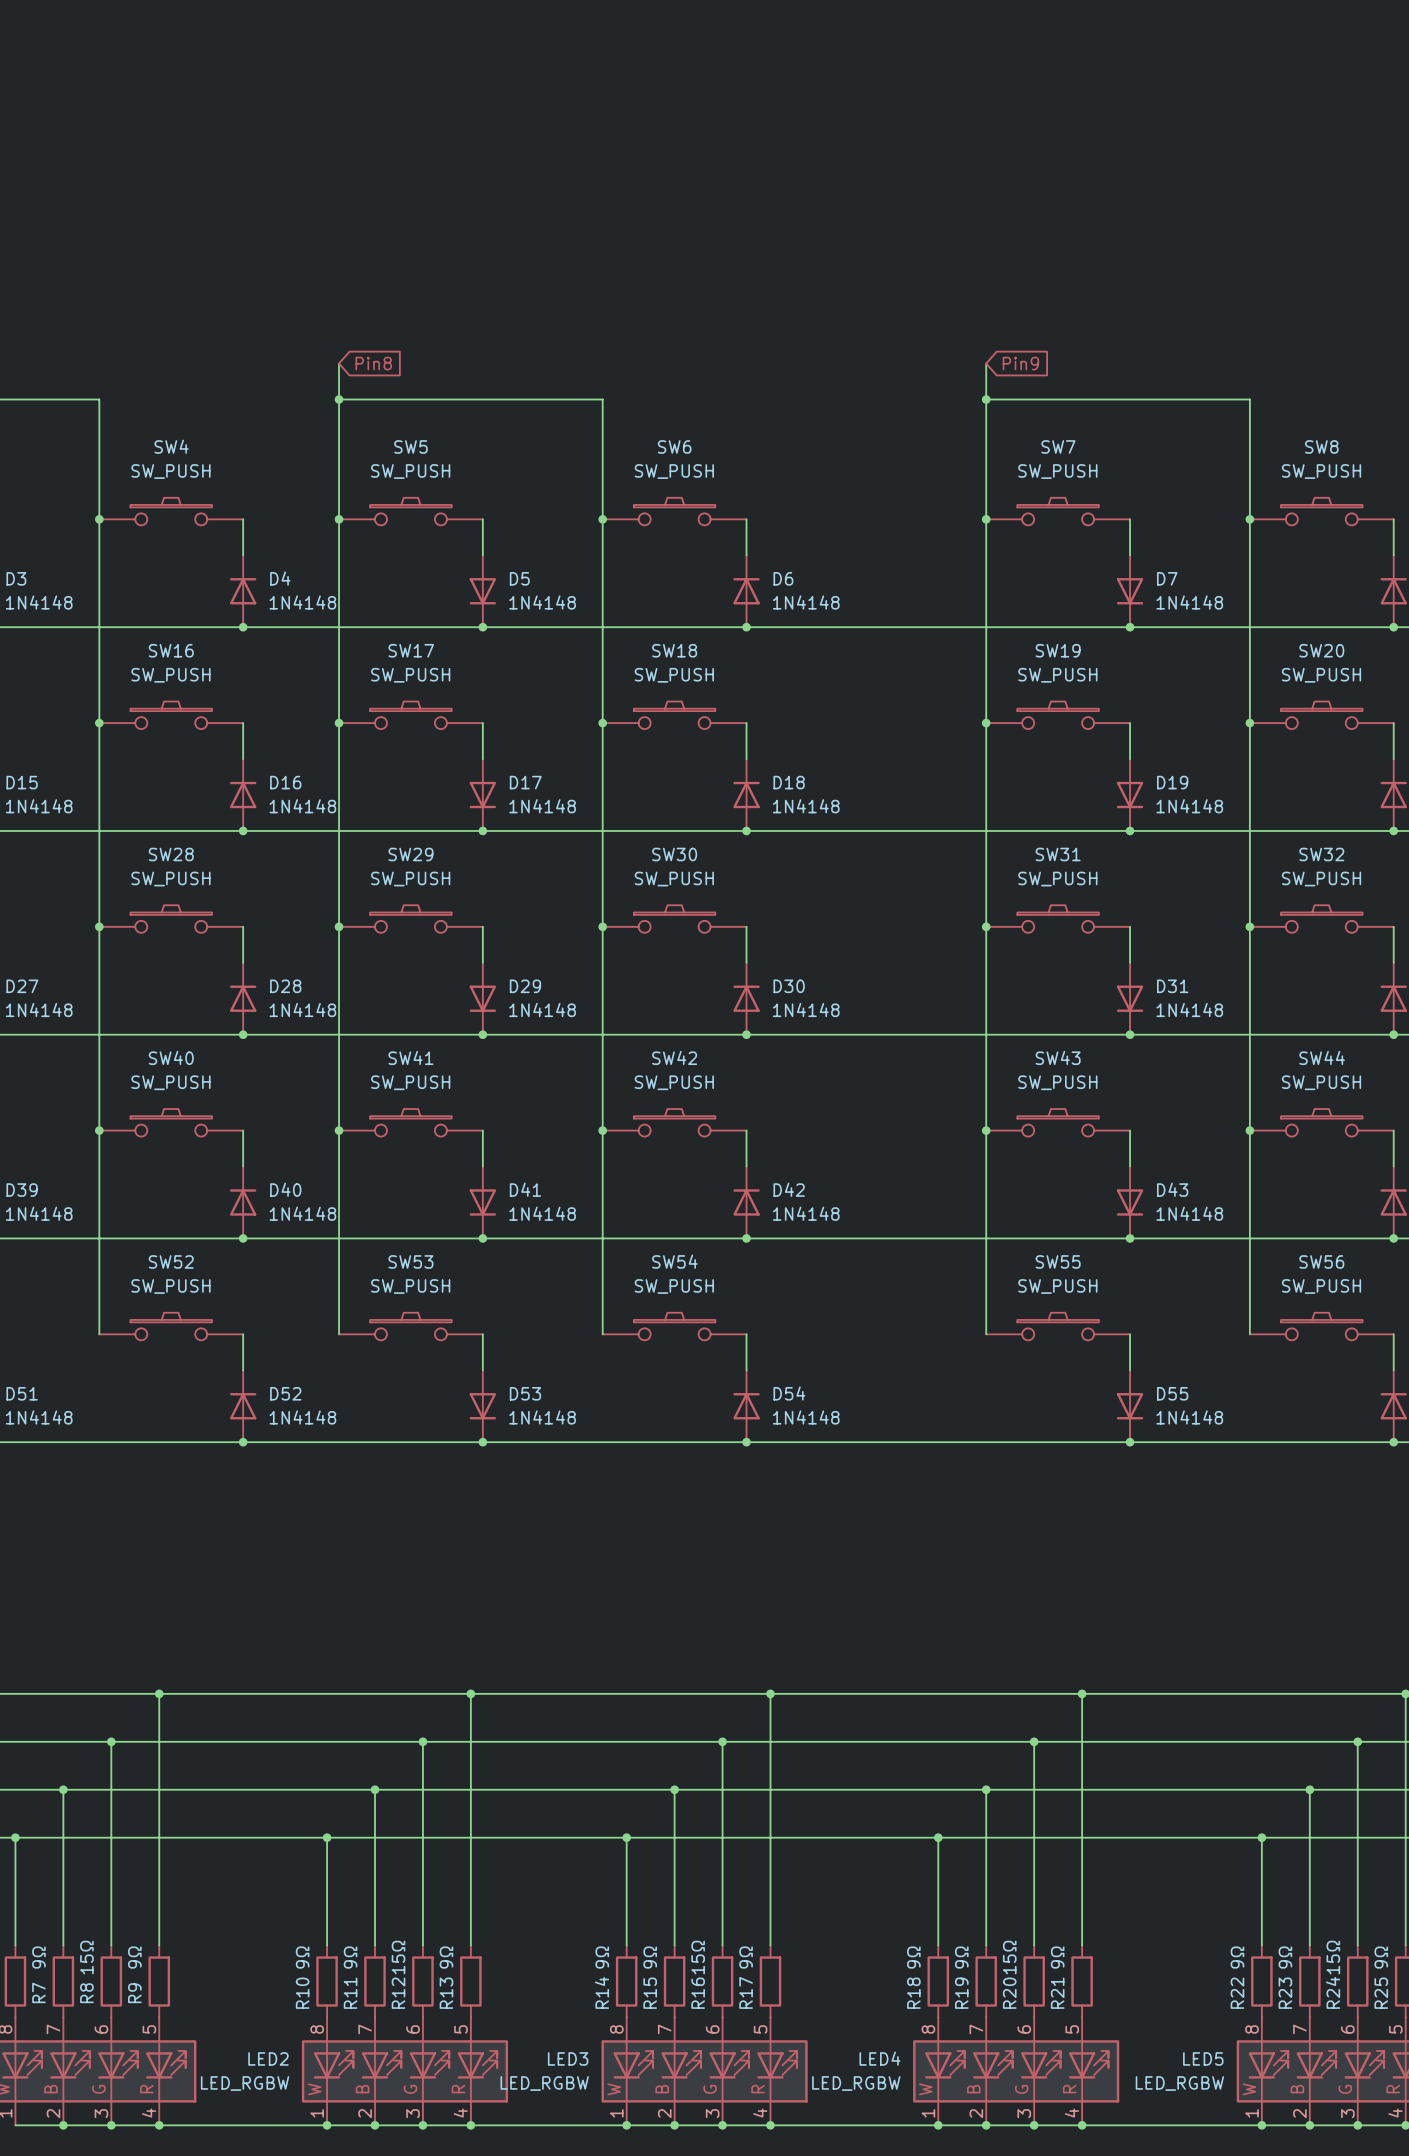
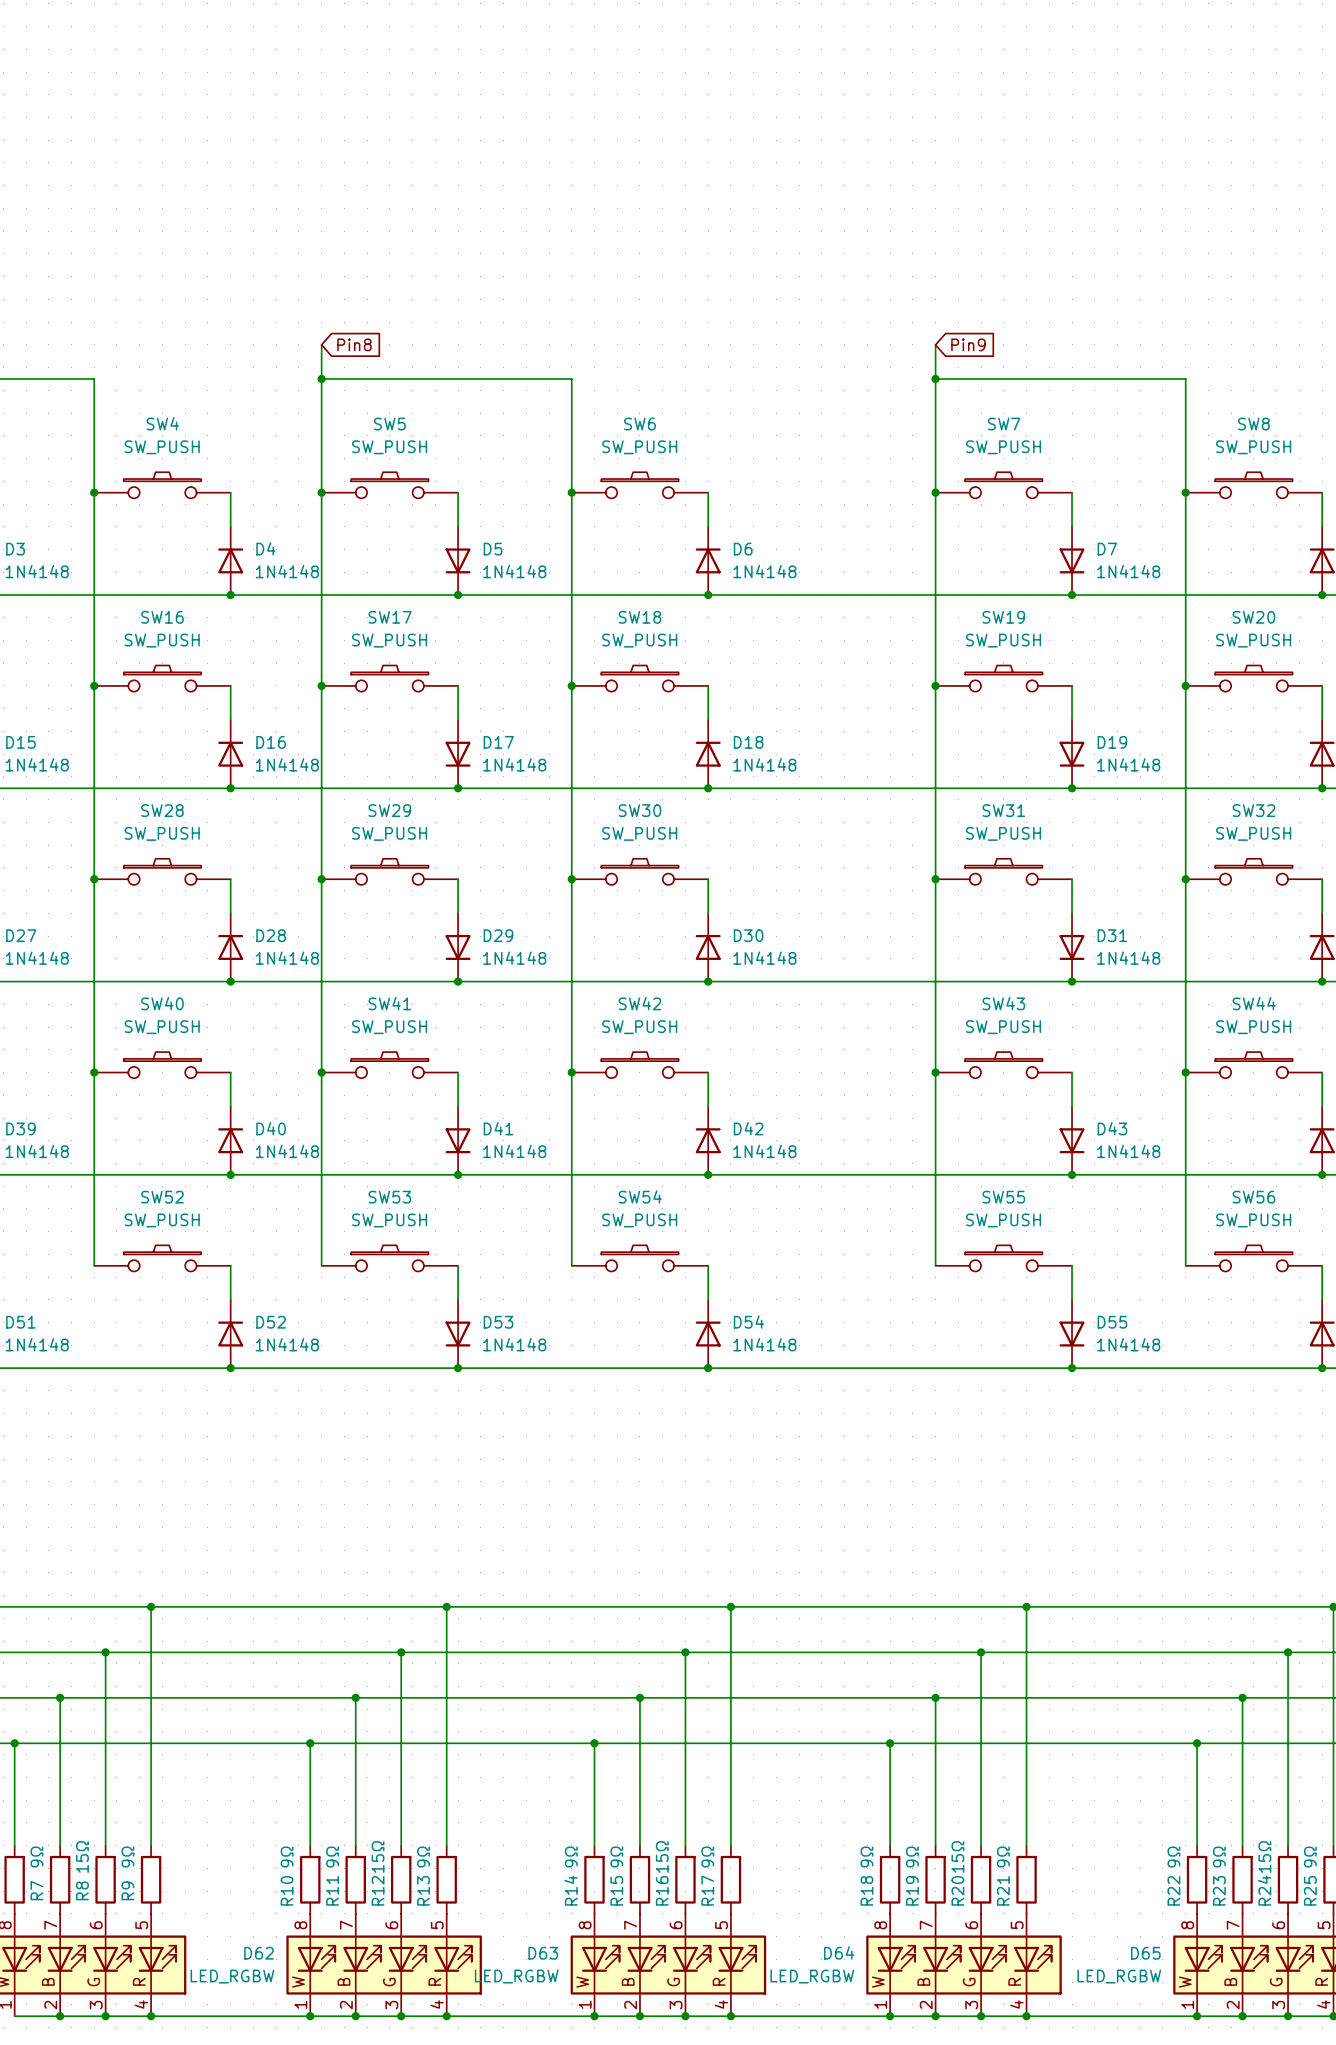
LED2 name: LED2 (268, 2058) -> D62 (259, 1953)
LED3 name: LED3 (568, 2058) -> D63 (543, 1953)
LED4 name: LED4 (879, 2058) -> D64 (839, 1952)
LED5 name: LED5 (1203, 2058) -> D65 (1145, 1953)

